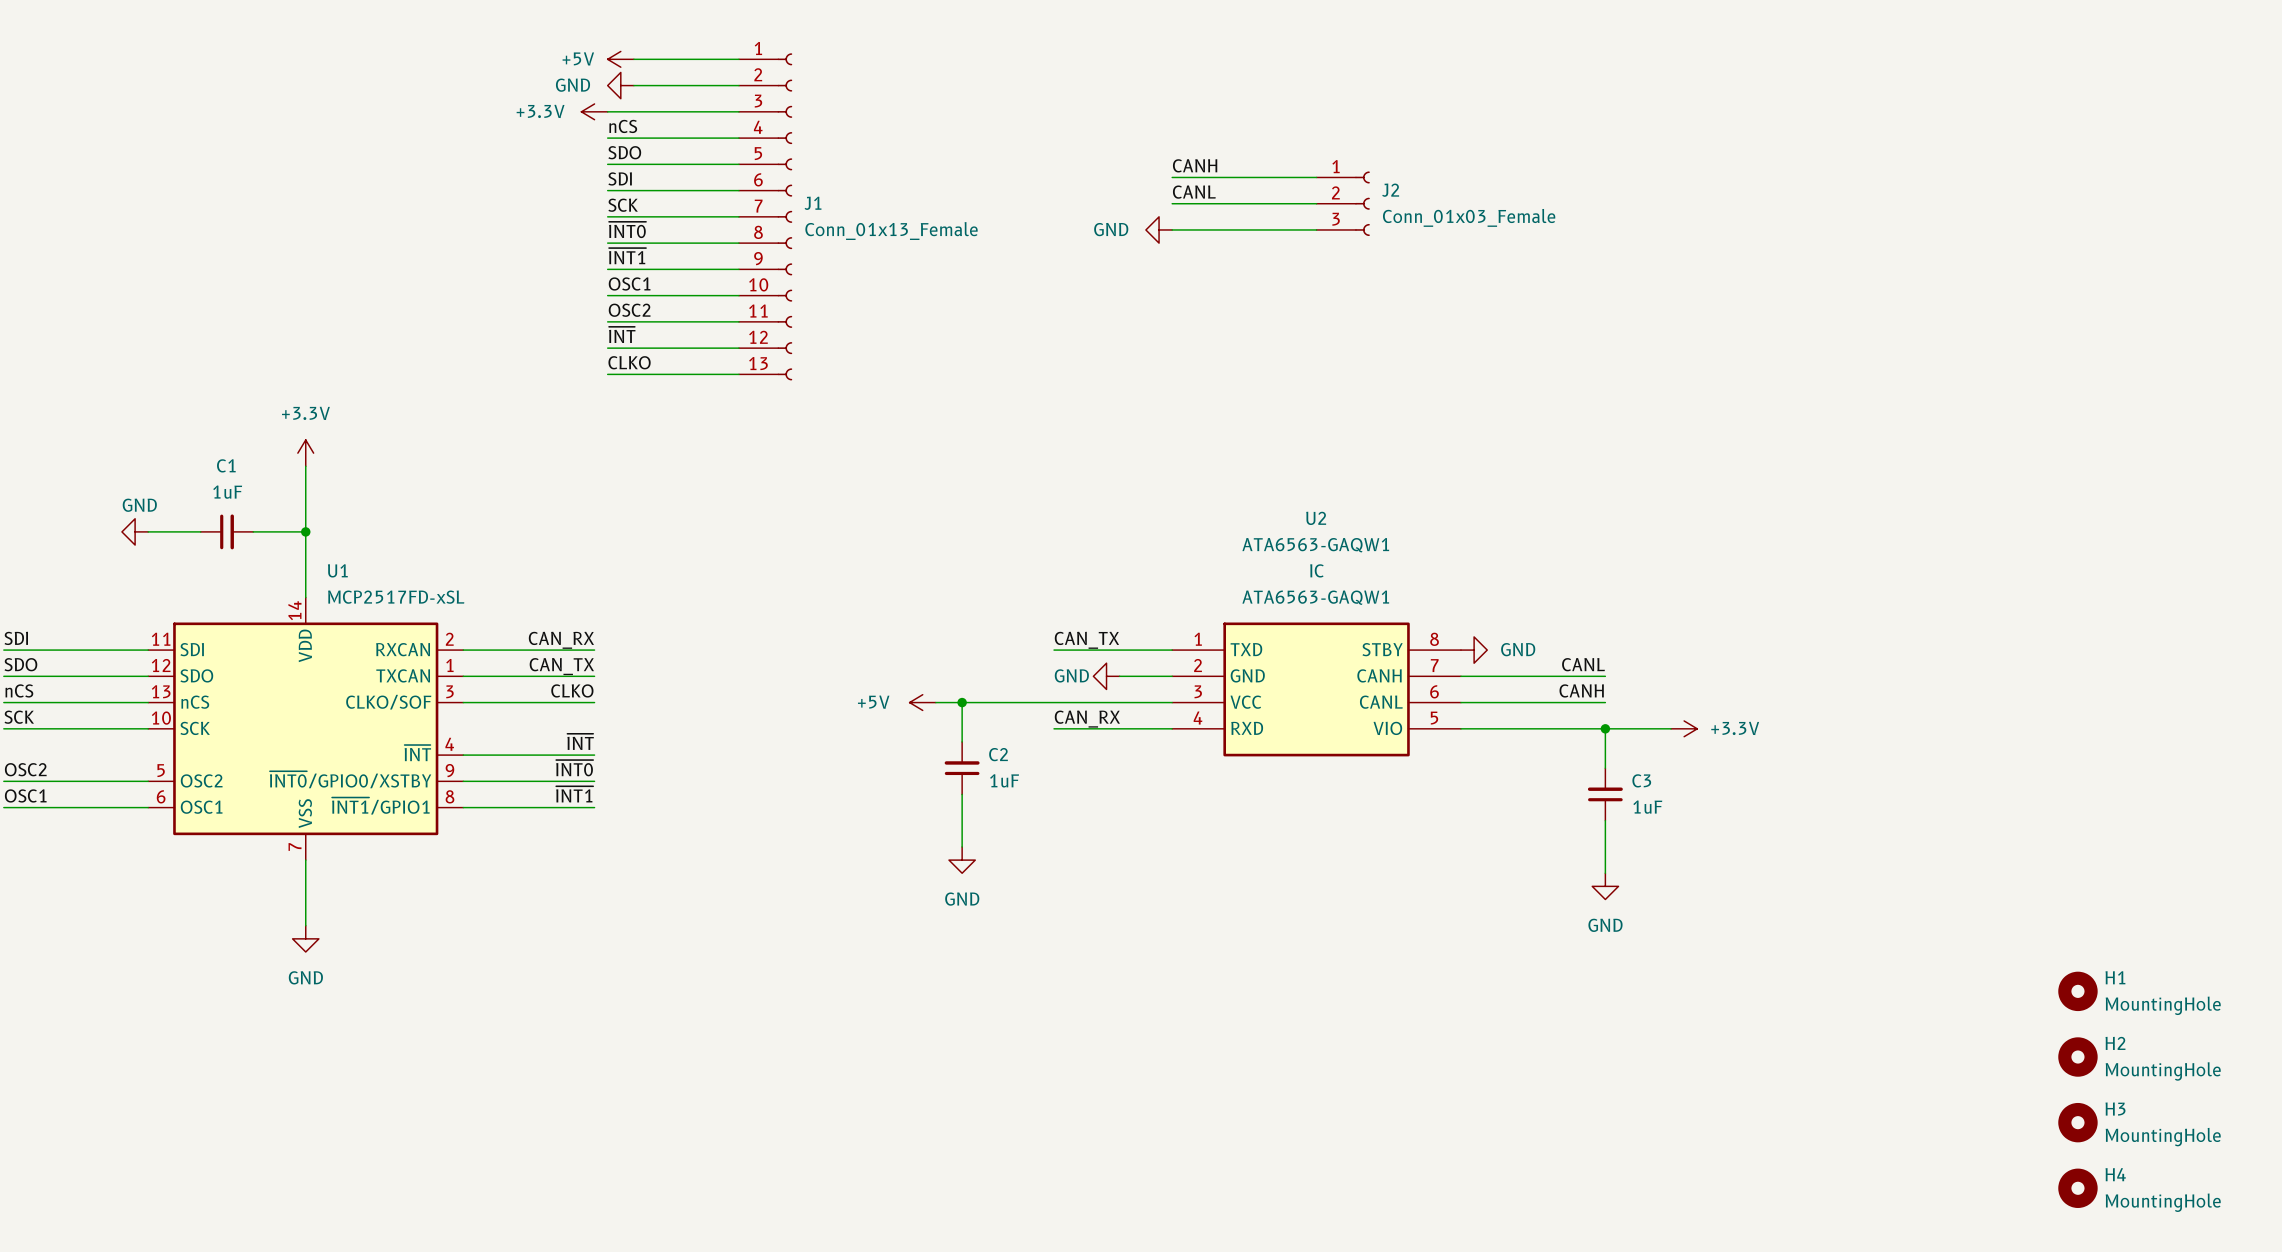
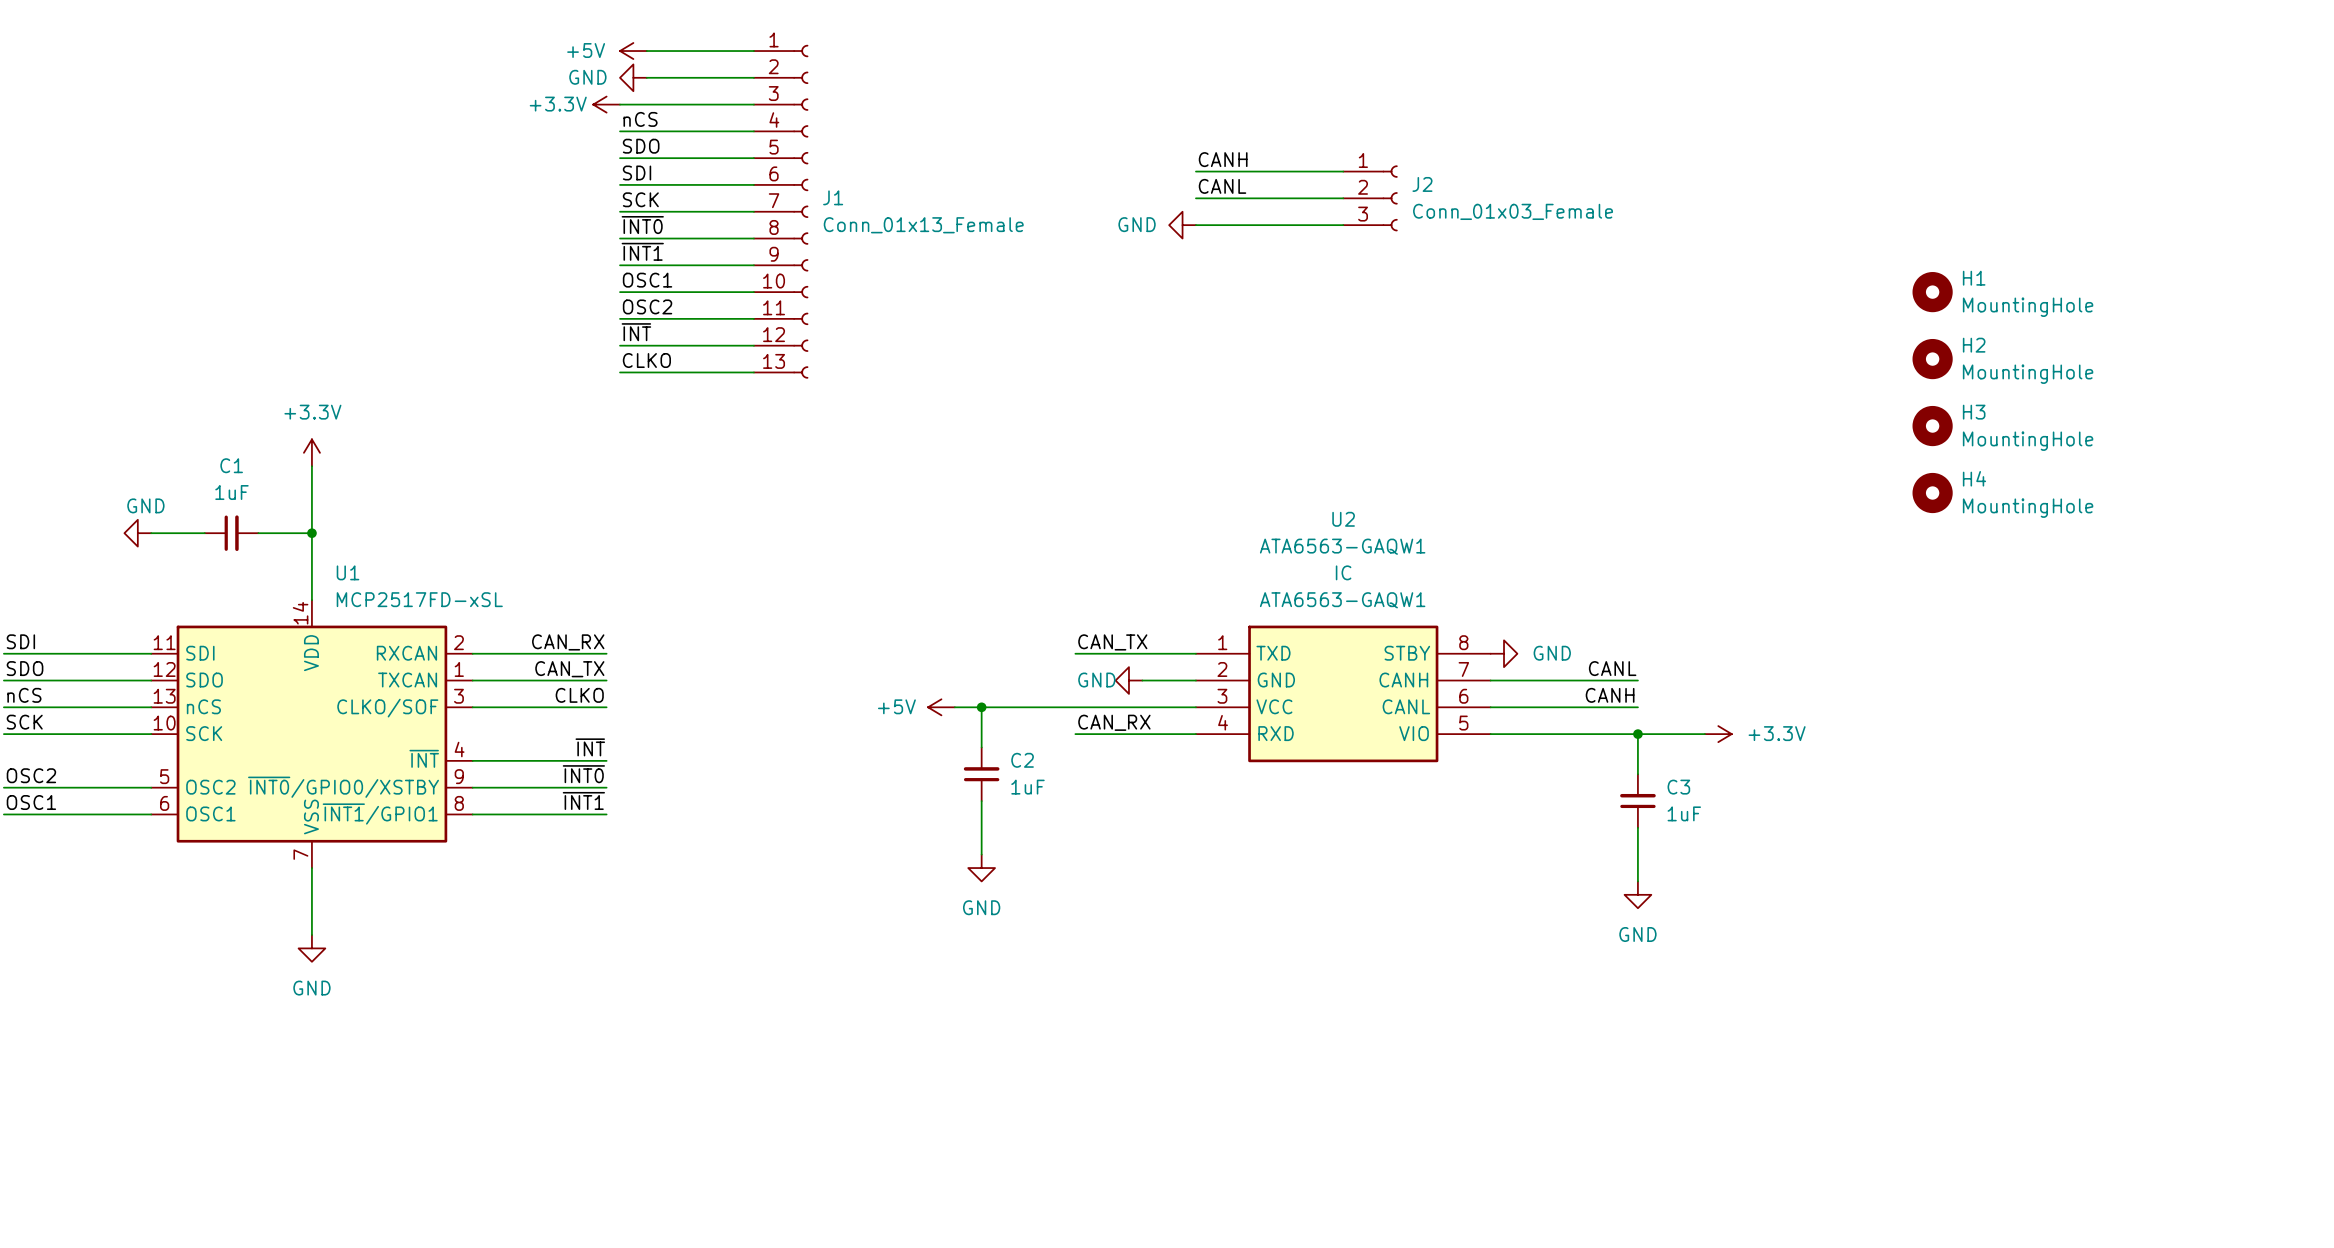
H1 position: (2077, 991) -> (1932, 292)
H2 position: (2077, 1057) -> (1932, 359)
H3 position: (2077, 1122) -> (1932, 426)
H4 position: (2077, 1188) -> (1932, 493)

